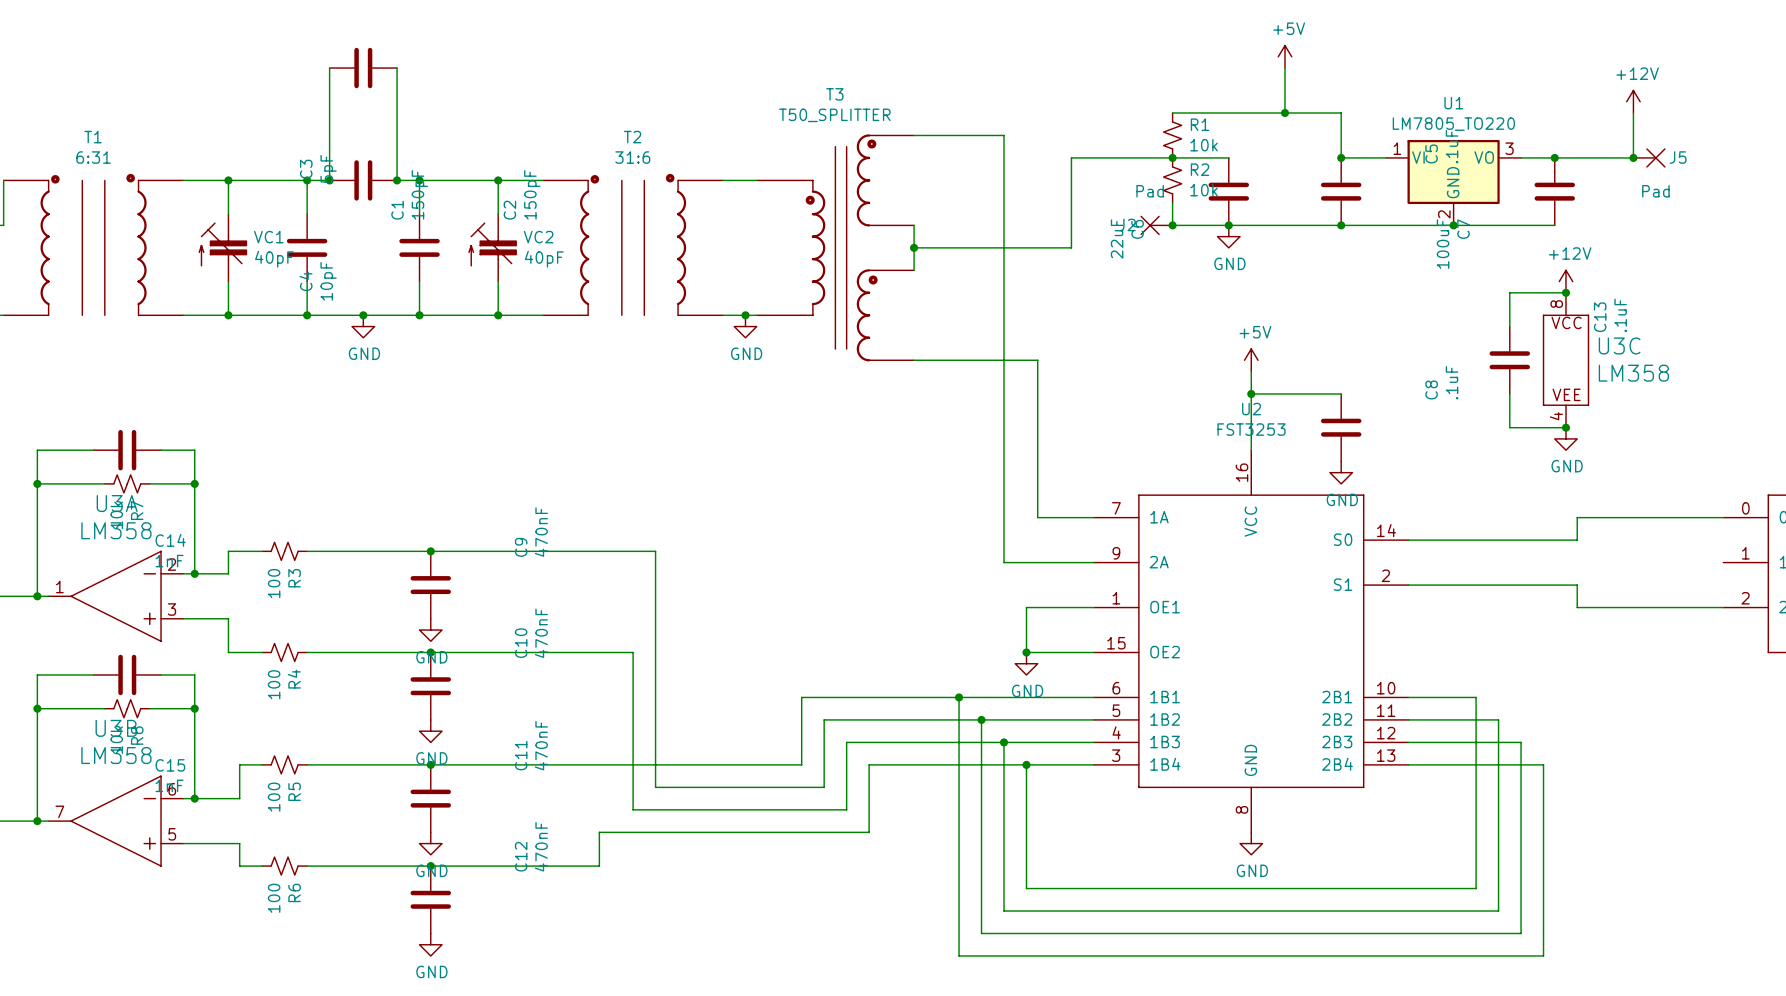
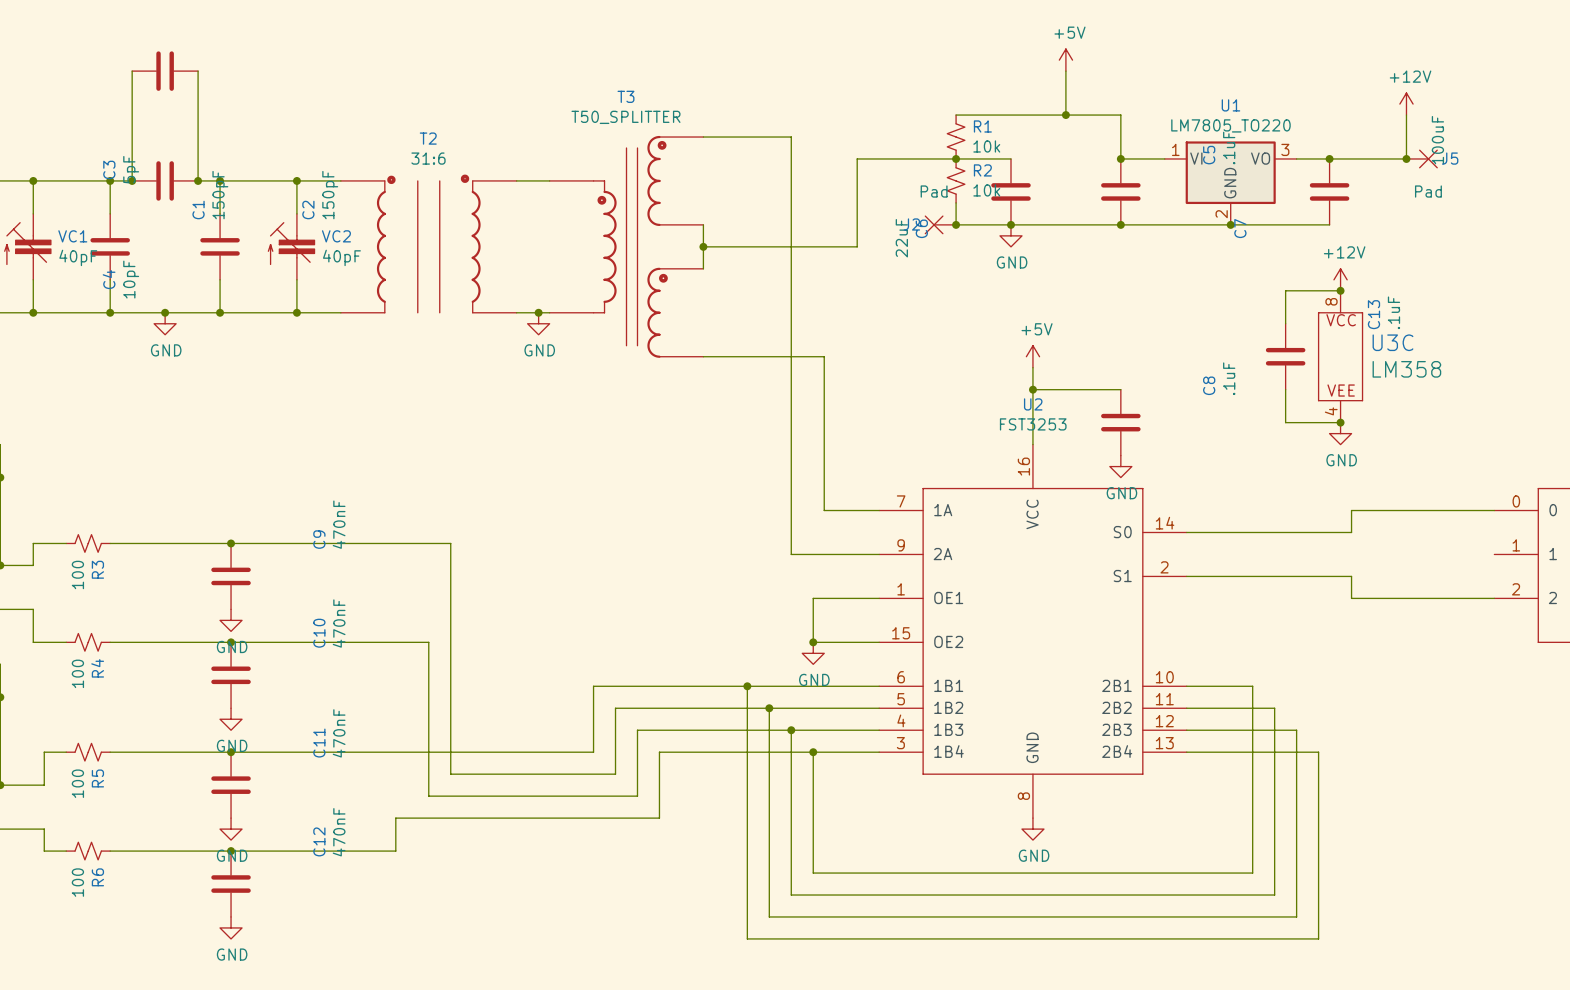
C7 value position: 100uF (1443, 244) -> 100uF (1437, 140)

